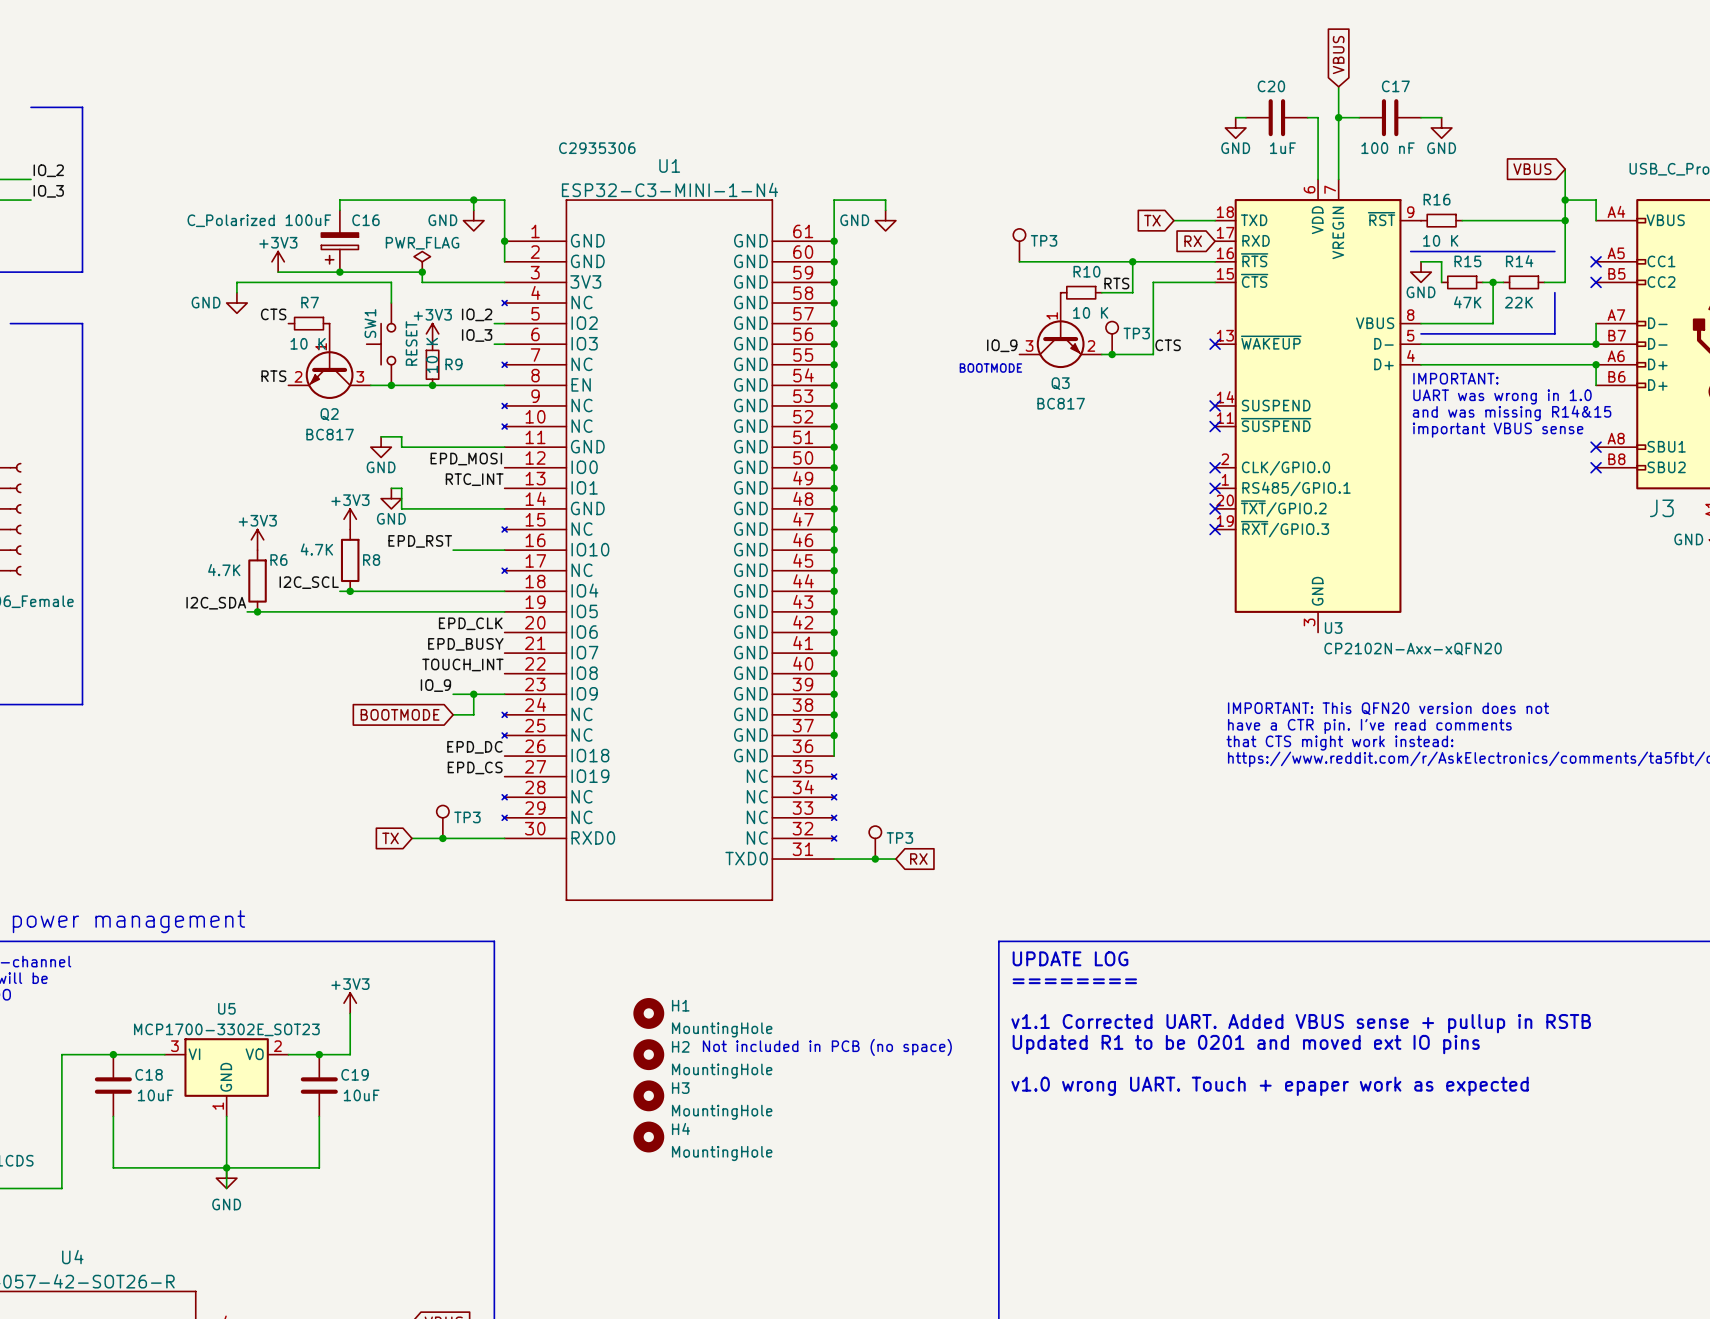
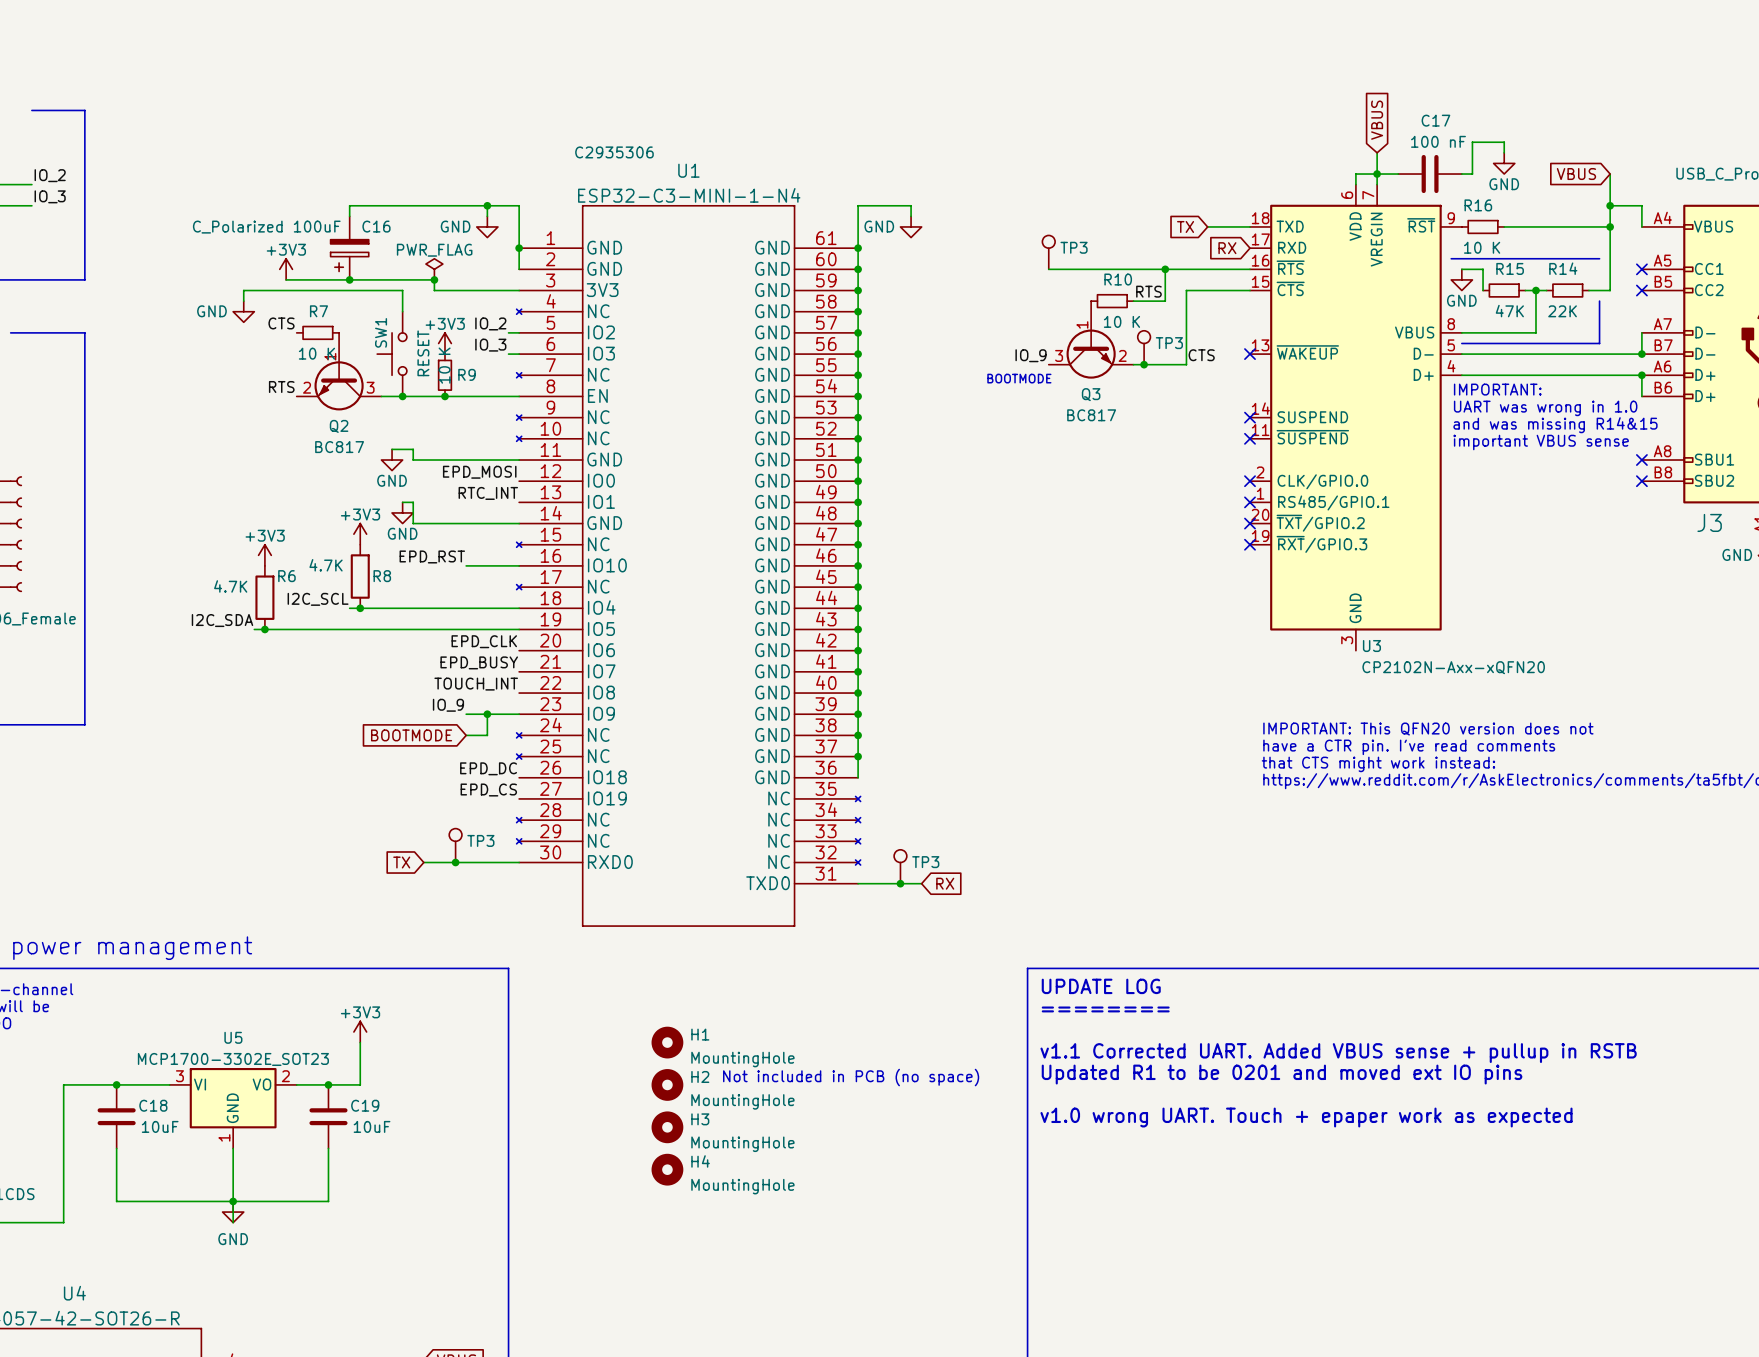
global label position: VBUS (1338, 55) -> VBUS (1377, 120)
wire: (1338, 86) (1338, 148) -> none
C17 name position: C17 (1395, 86) -> C17 (1435, 120)
wire: (1235, 117) (1245, 117) -> none
C20: 1uF (1276, 117) -> none
wire: (1307, 117) (1318, 117) (1318, 169) -> (1398, 174) (1355, 174)
wire: (1338, 117) (1359, 117) -> none
junction: (1338, 117) -> none
C17 position: (1390, 117) -> (1430, 174)
wire: (1421, 117) (1441, 117) -> none
power symbol: GND (1235, 127) -> none
power symbol position: GND (1441, 127) -> GND (1504, 163)
C17 value position: 100 nF (1388, 148) -> 100 nF (1438, 141)
wire: none -> (1504, 152) (1504, 142) (1472, 142) (1472, 174) (1461, 174)
junction: none -> (1377, 174)

